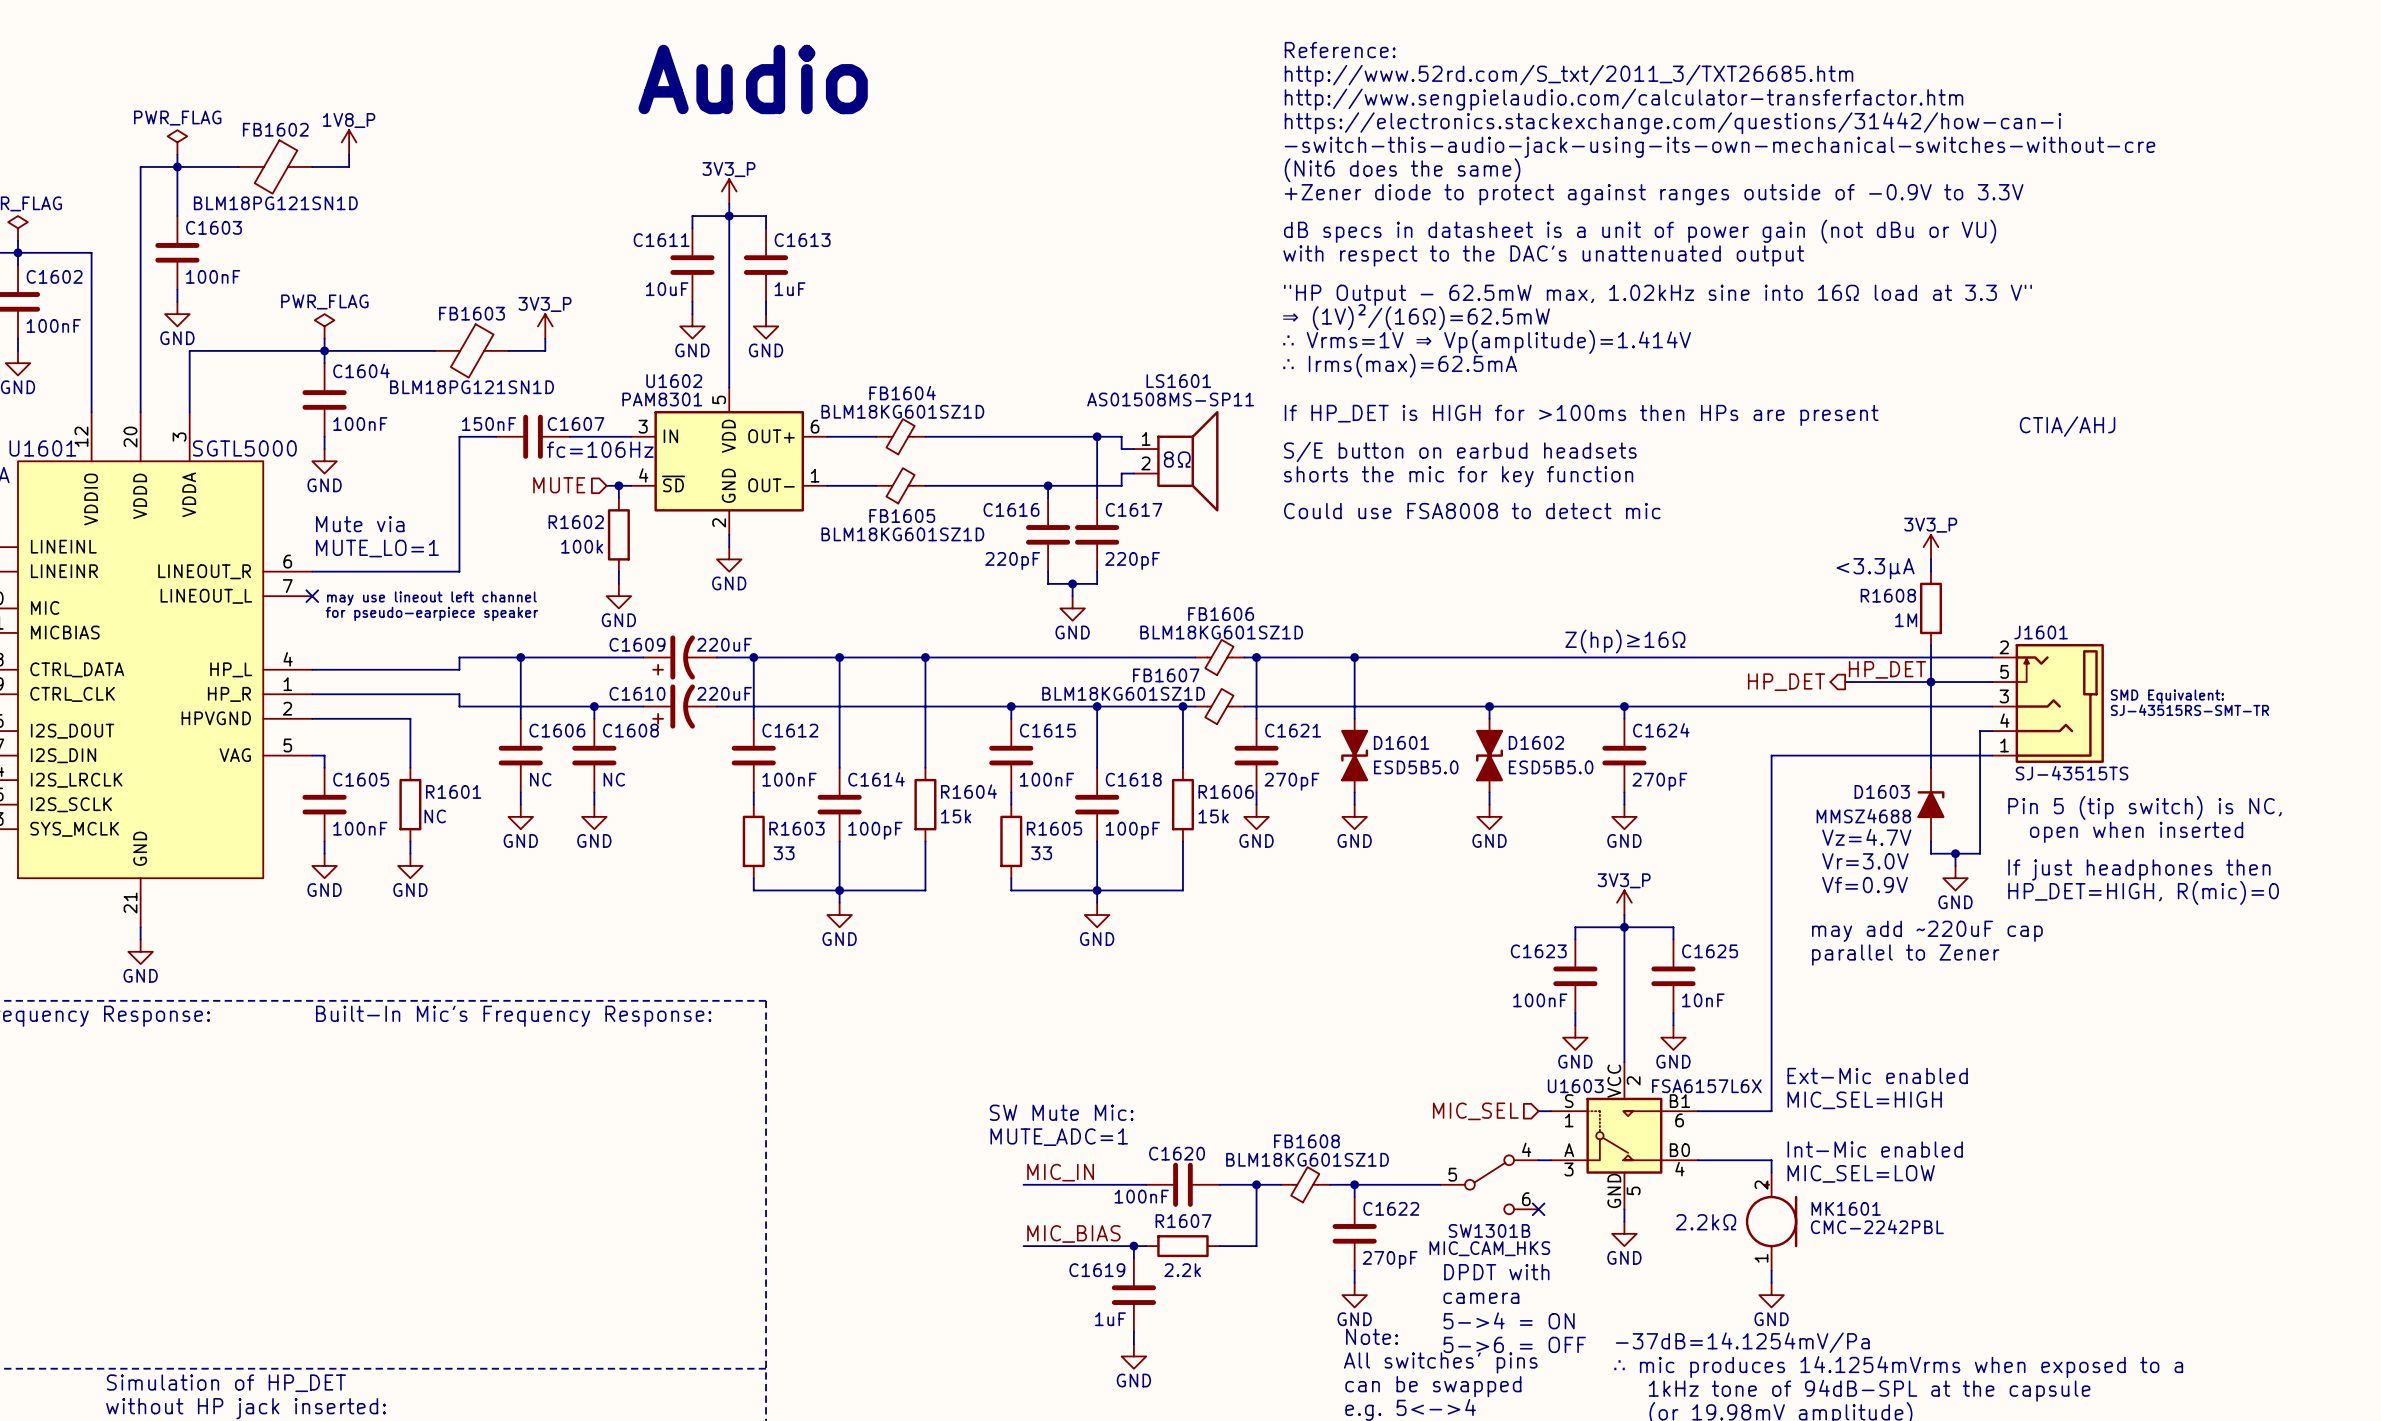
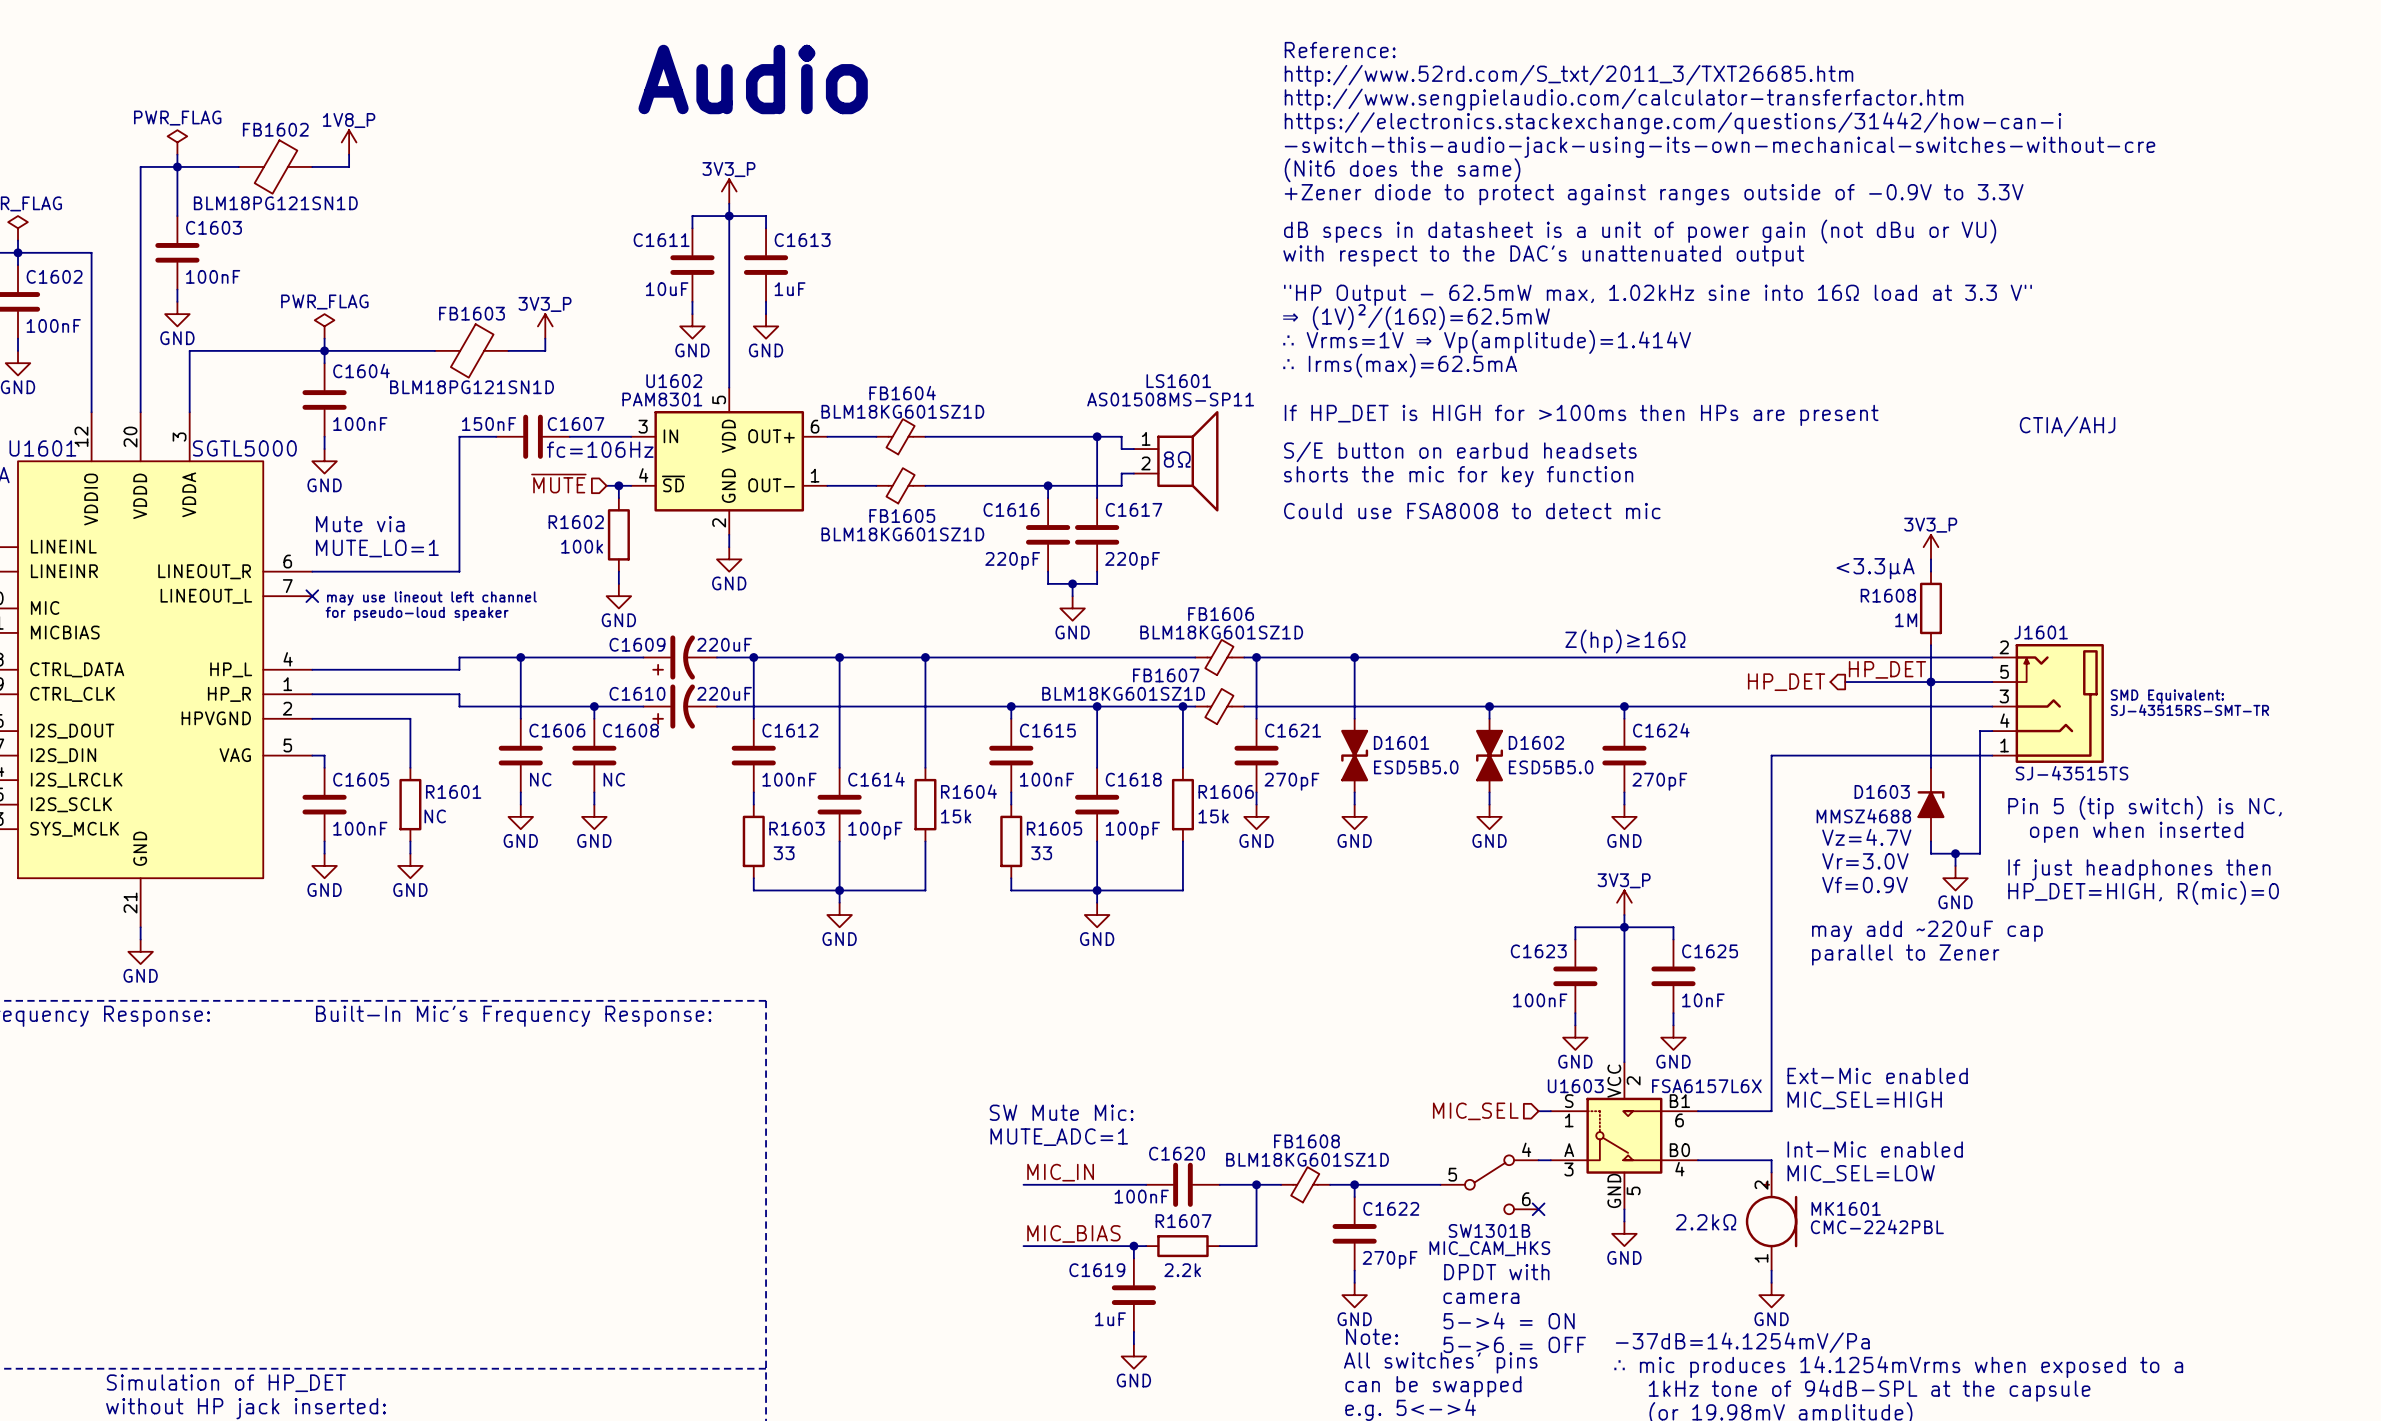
hierarchical label: MUTE (559, 485) -> ~{MUTE} (558, 483)
text: for pseudo-earpiece speaker (431, 613) -> for pseudo-loud speaker (417, 613)

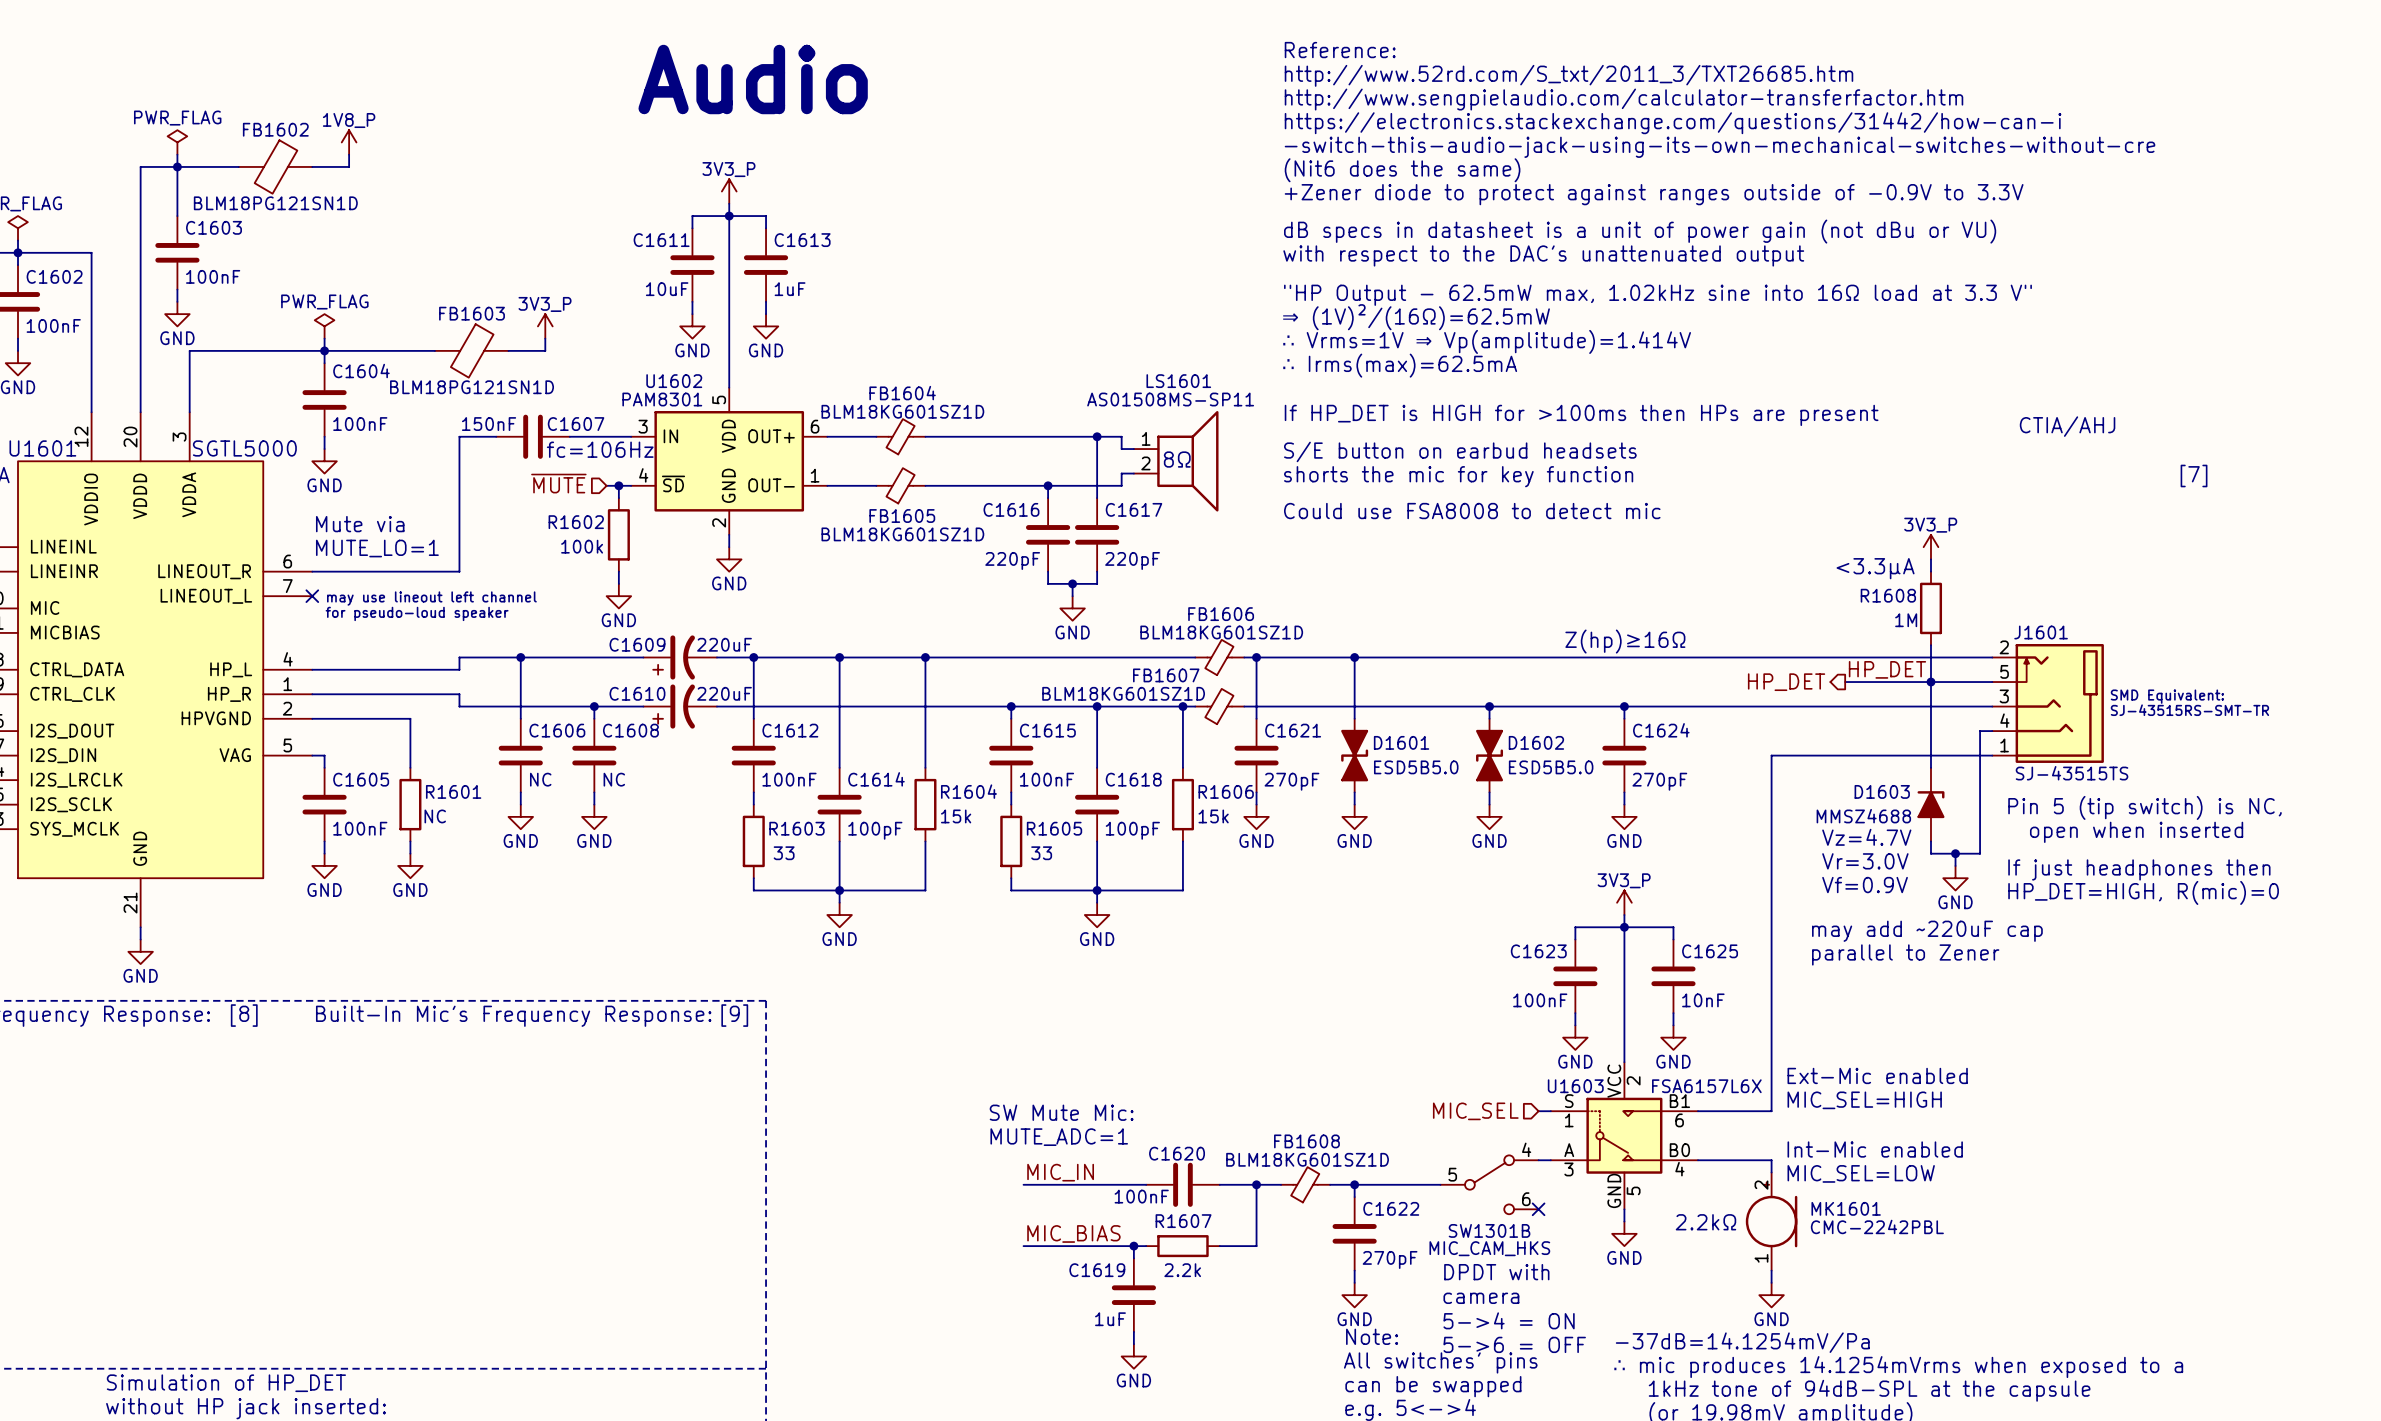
text: none -> [7] (2194, 475)
text: none -> [8] (244, 1015)
text: none -> [9] (734, 1015)

